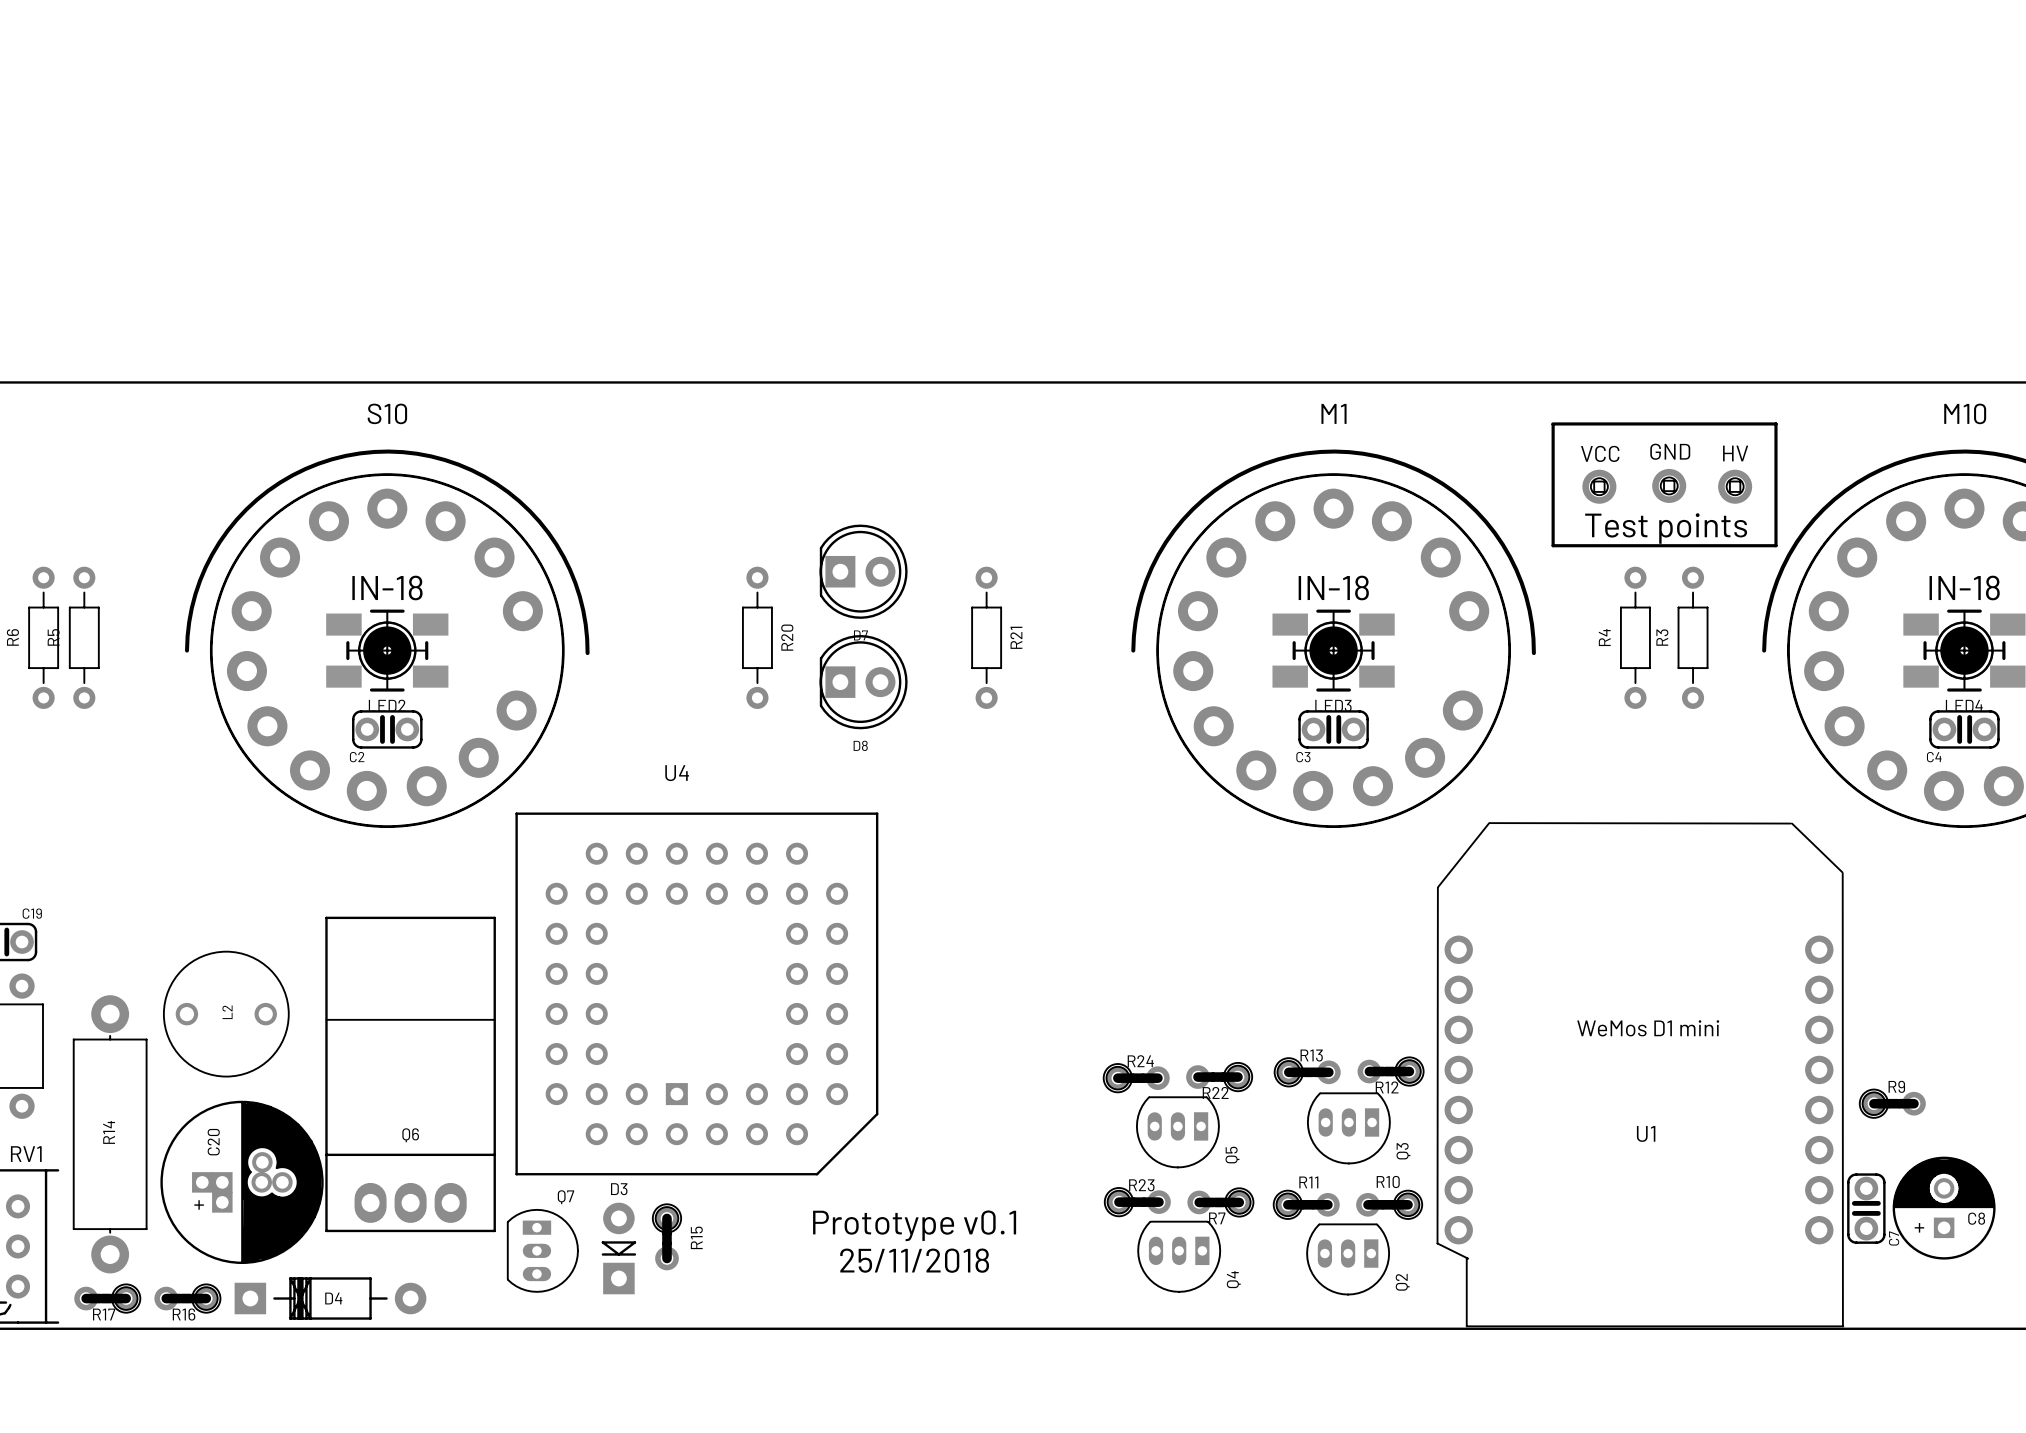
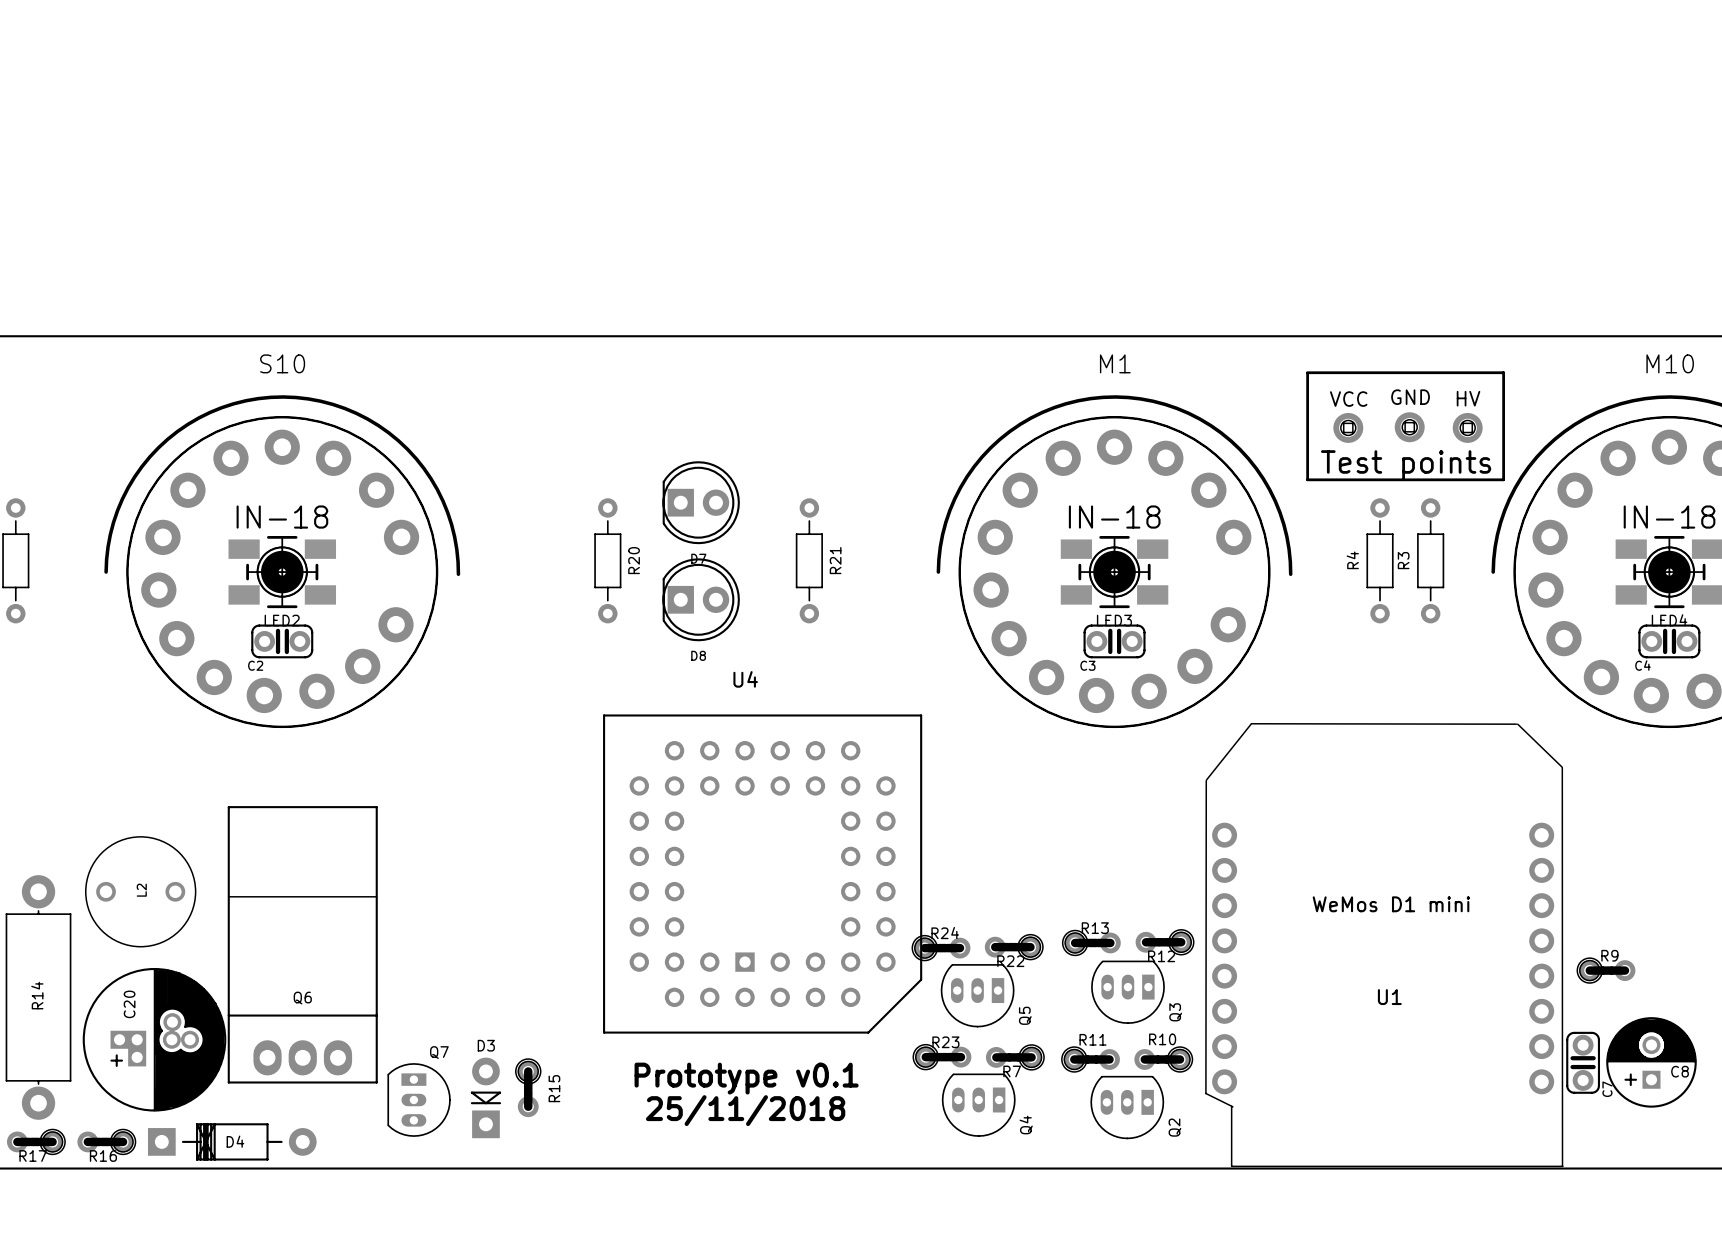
U4 position: (696, 993) -> (762, 874)

